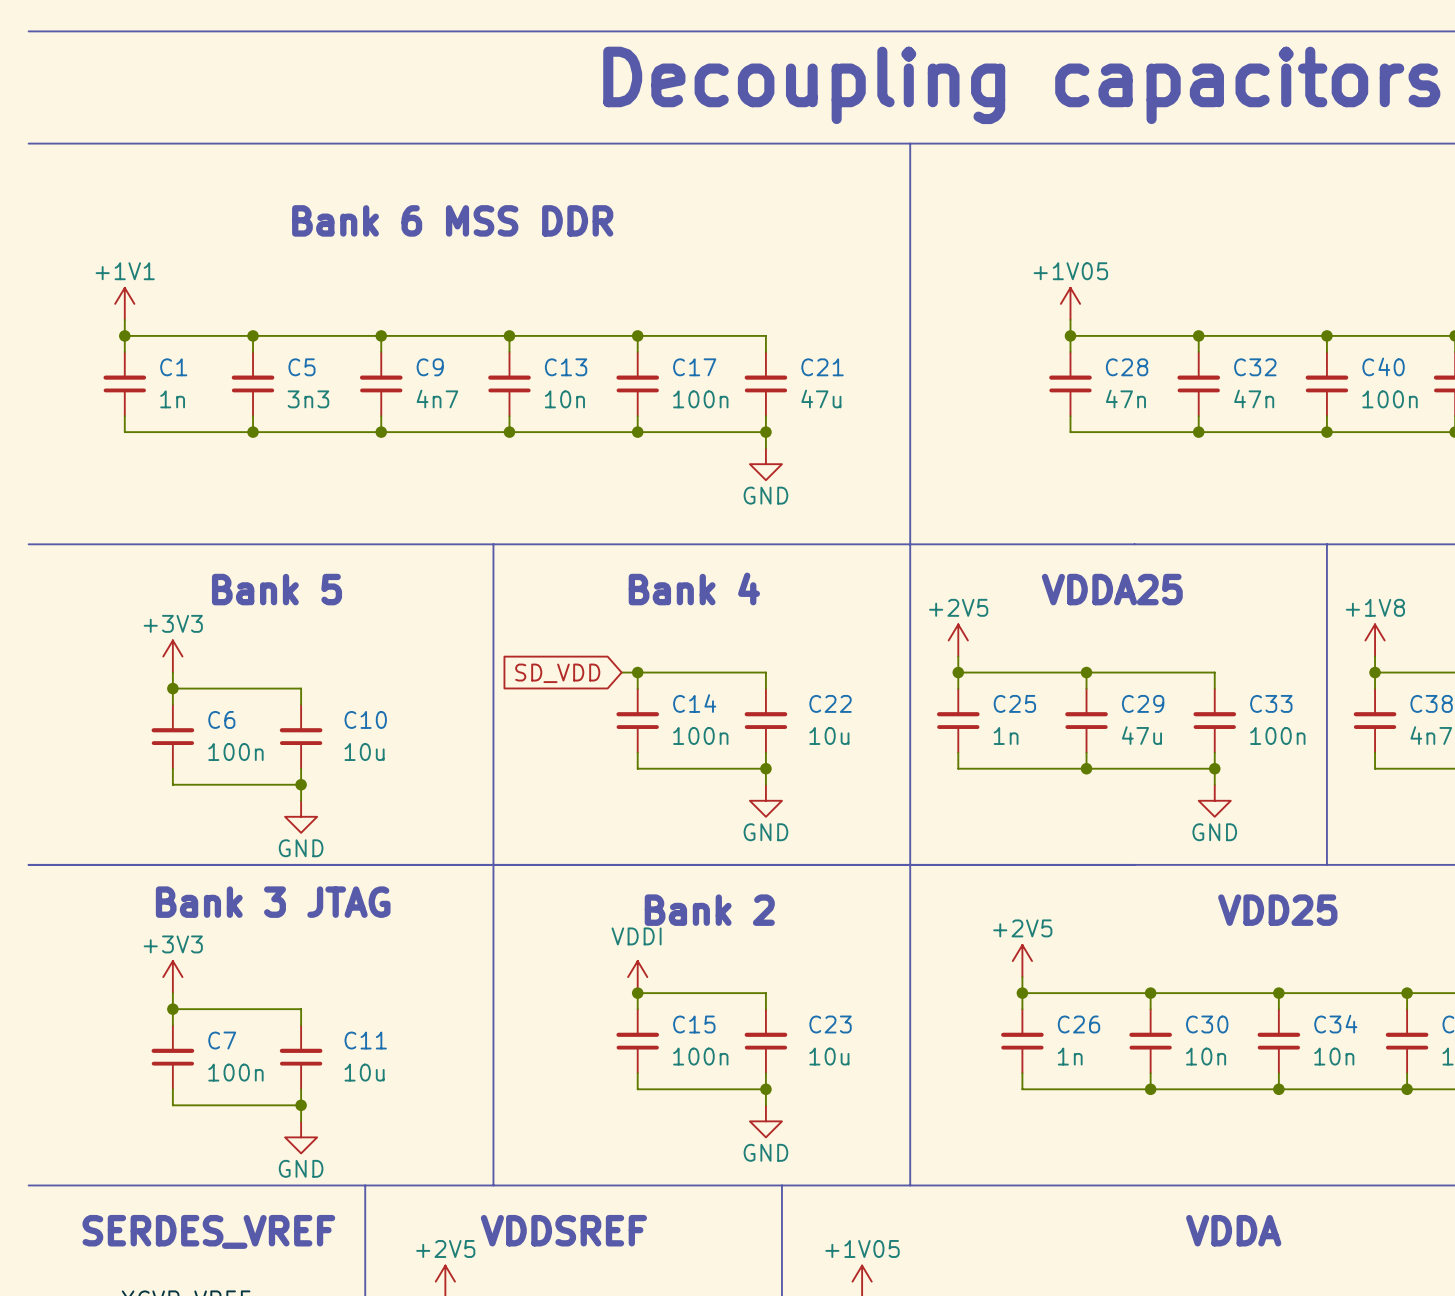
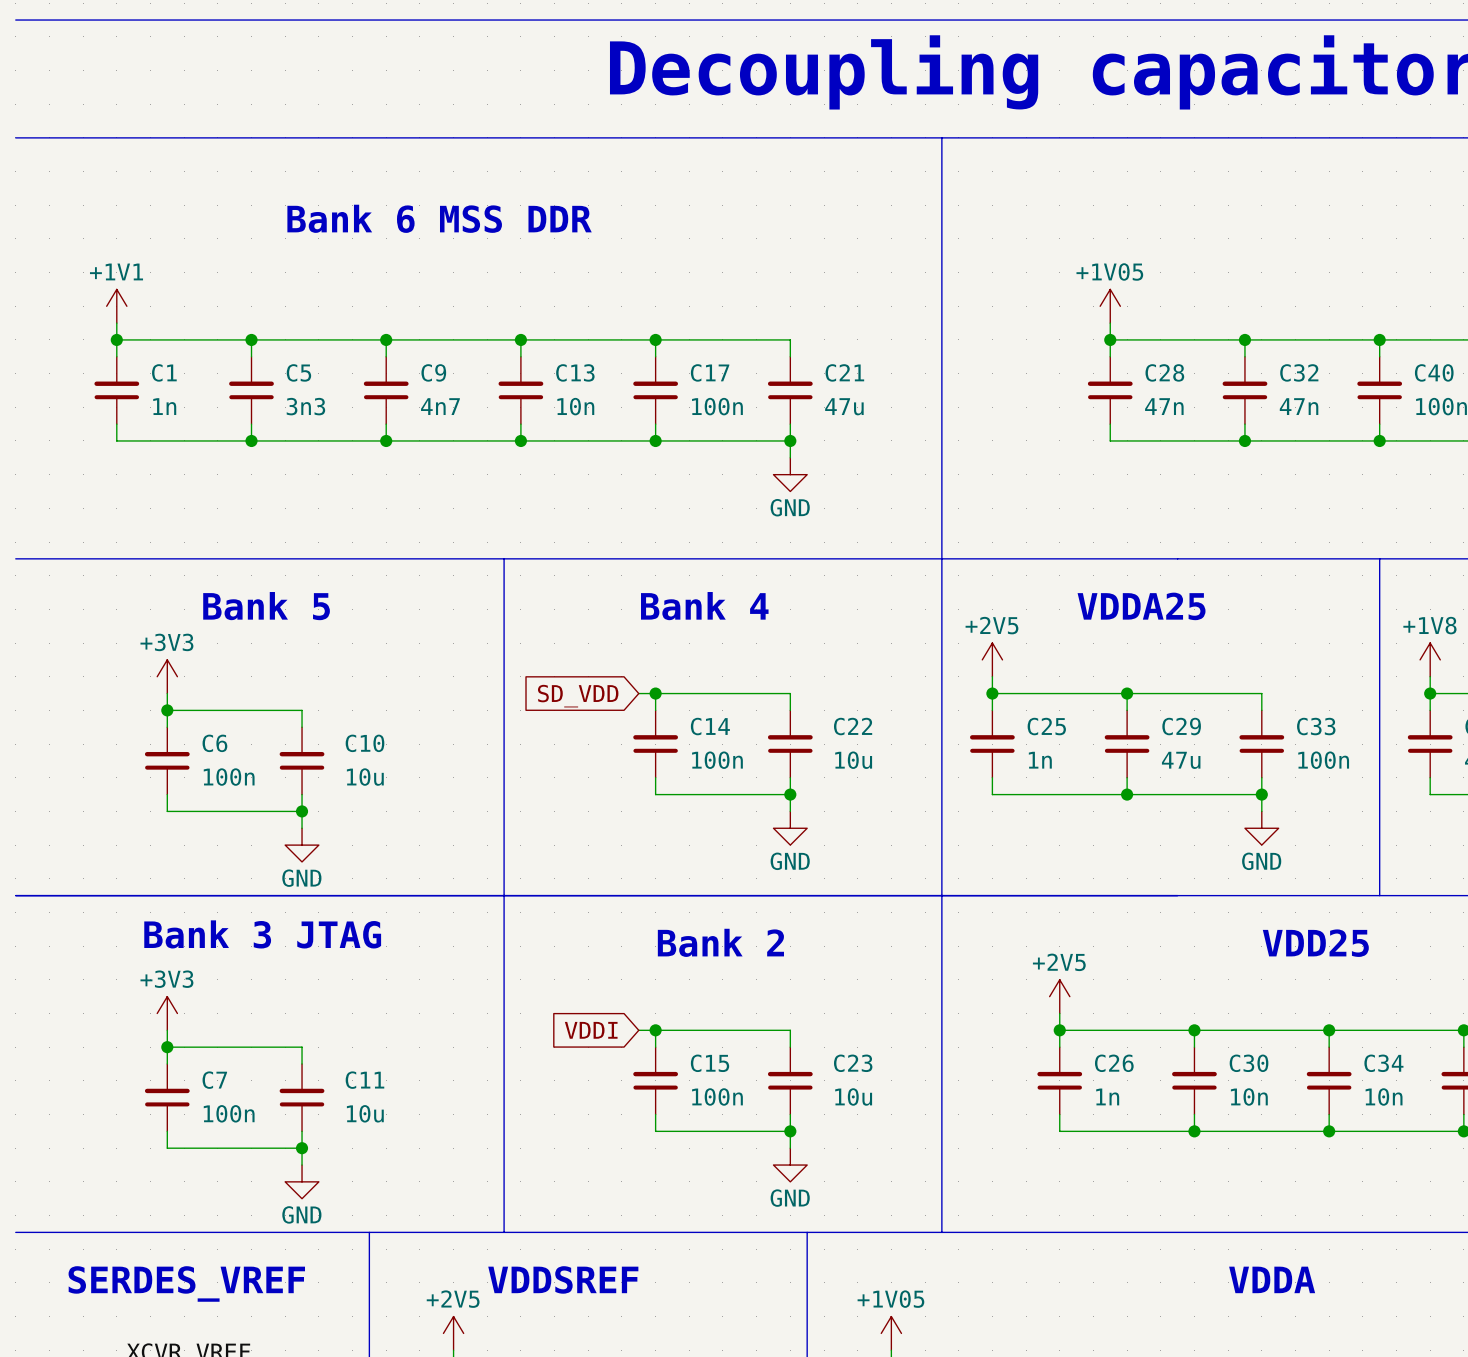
power symbol: VDDI (637, 977) -> none
global label: none -> VDDI (591, 1030)
wire: none -> (638, 1030) (655, 1030)

